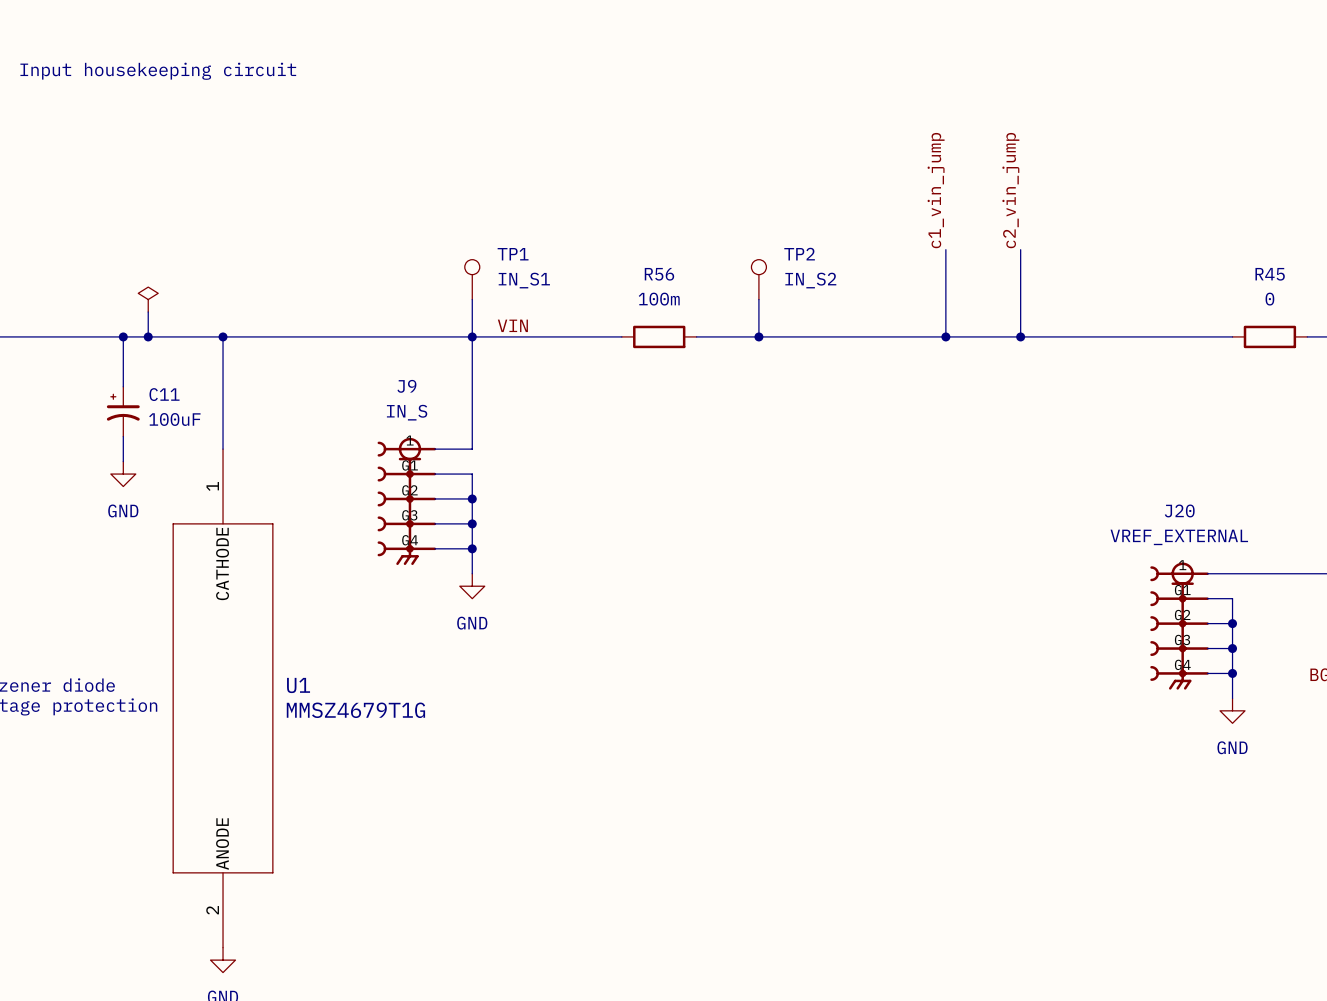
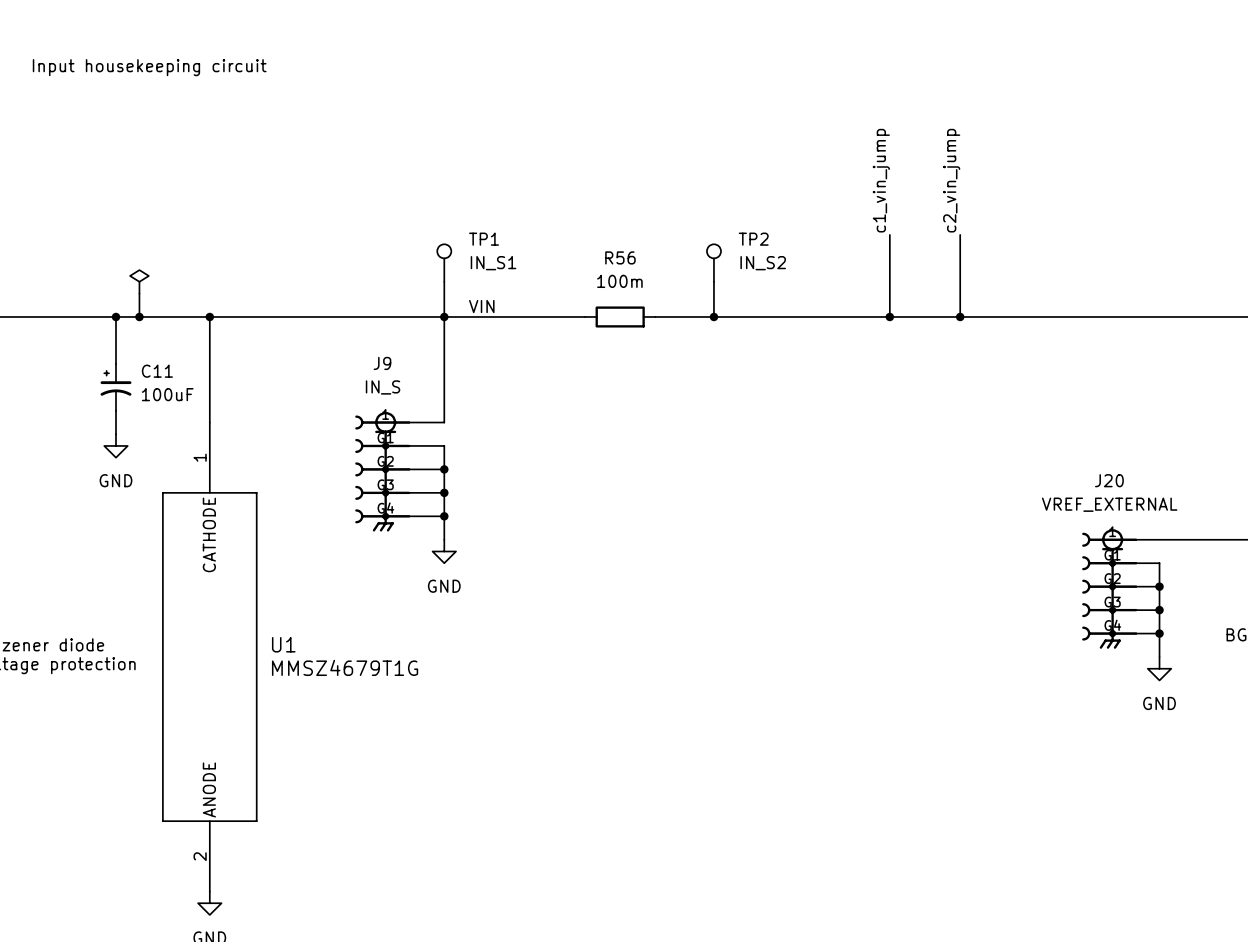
wire: none -> (1159, 316) (1229, 316)
R45: 0 (1269, 336) -> none

